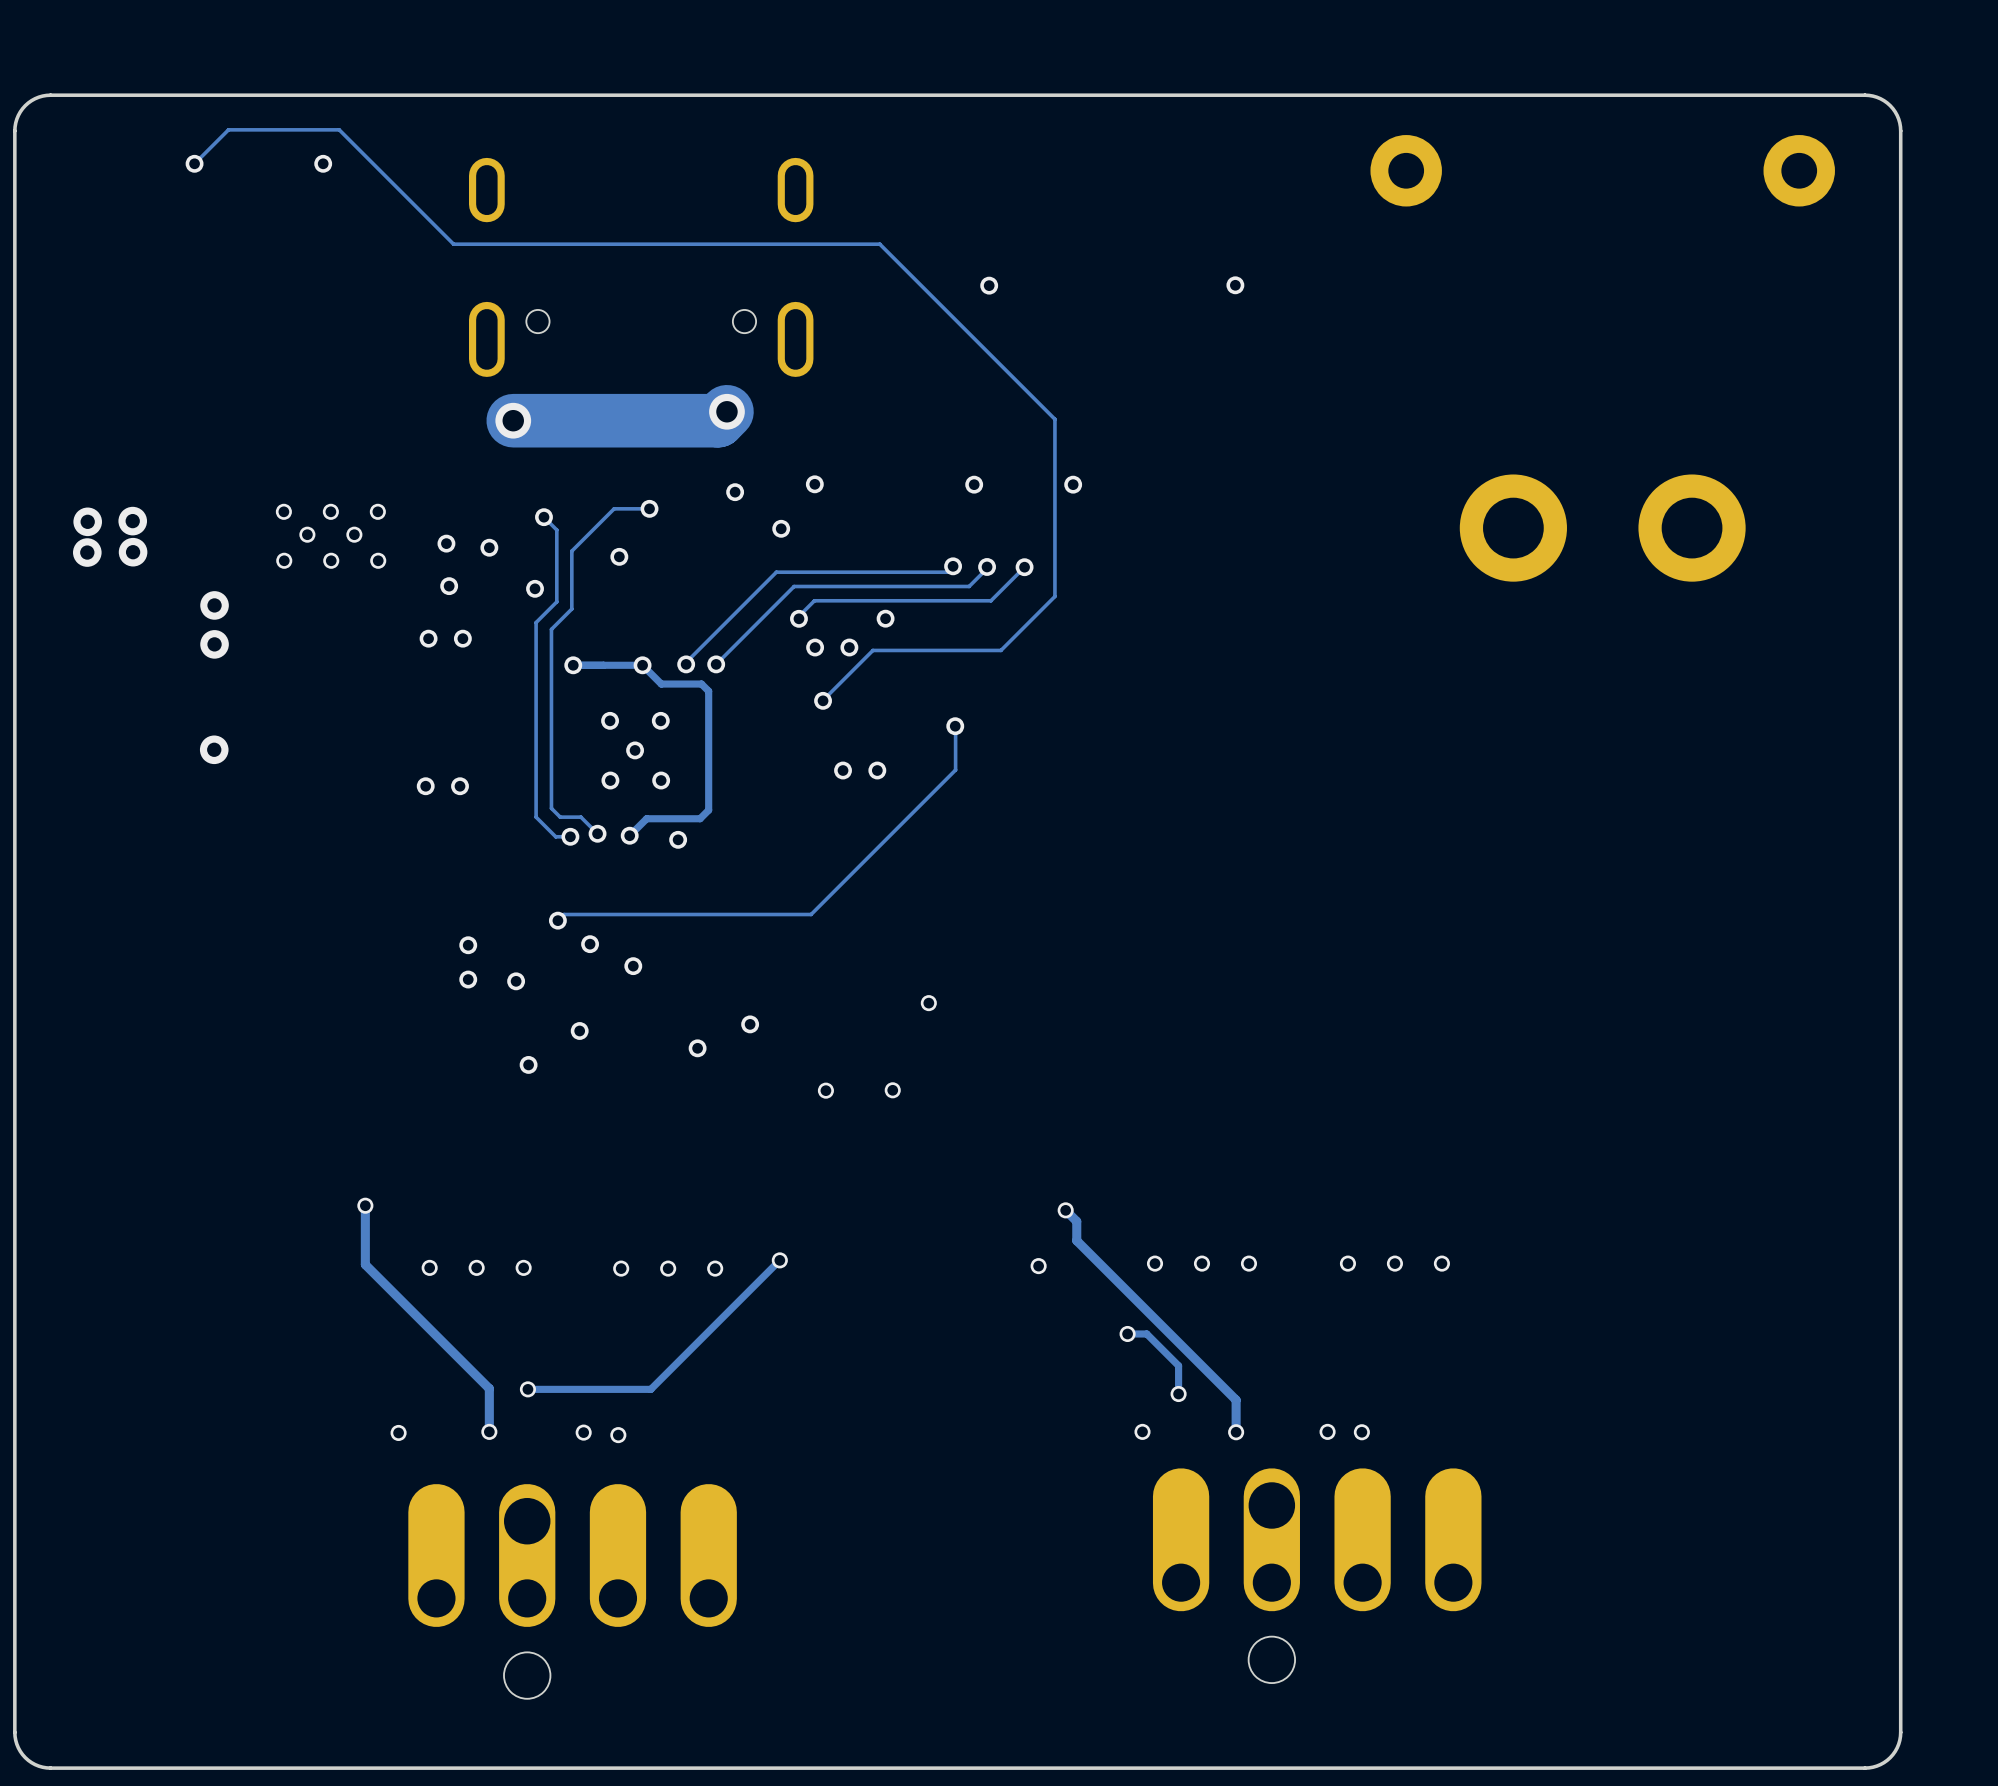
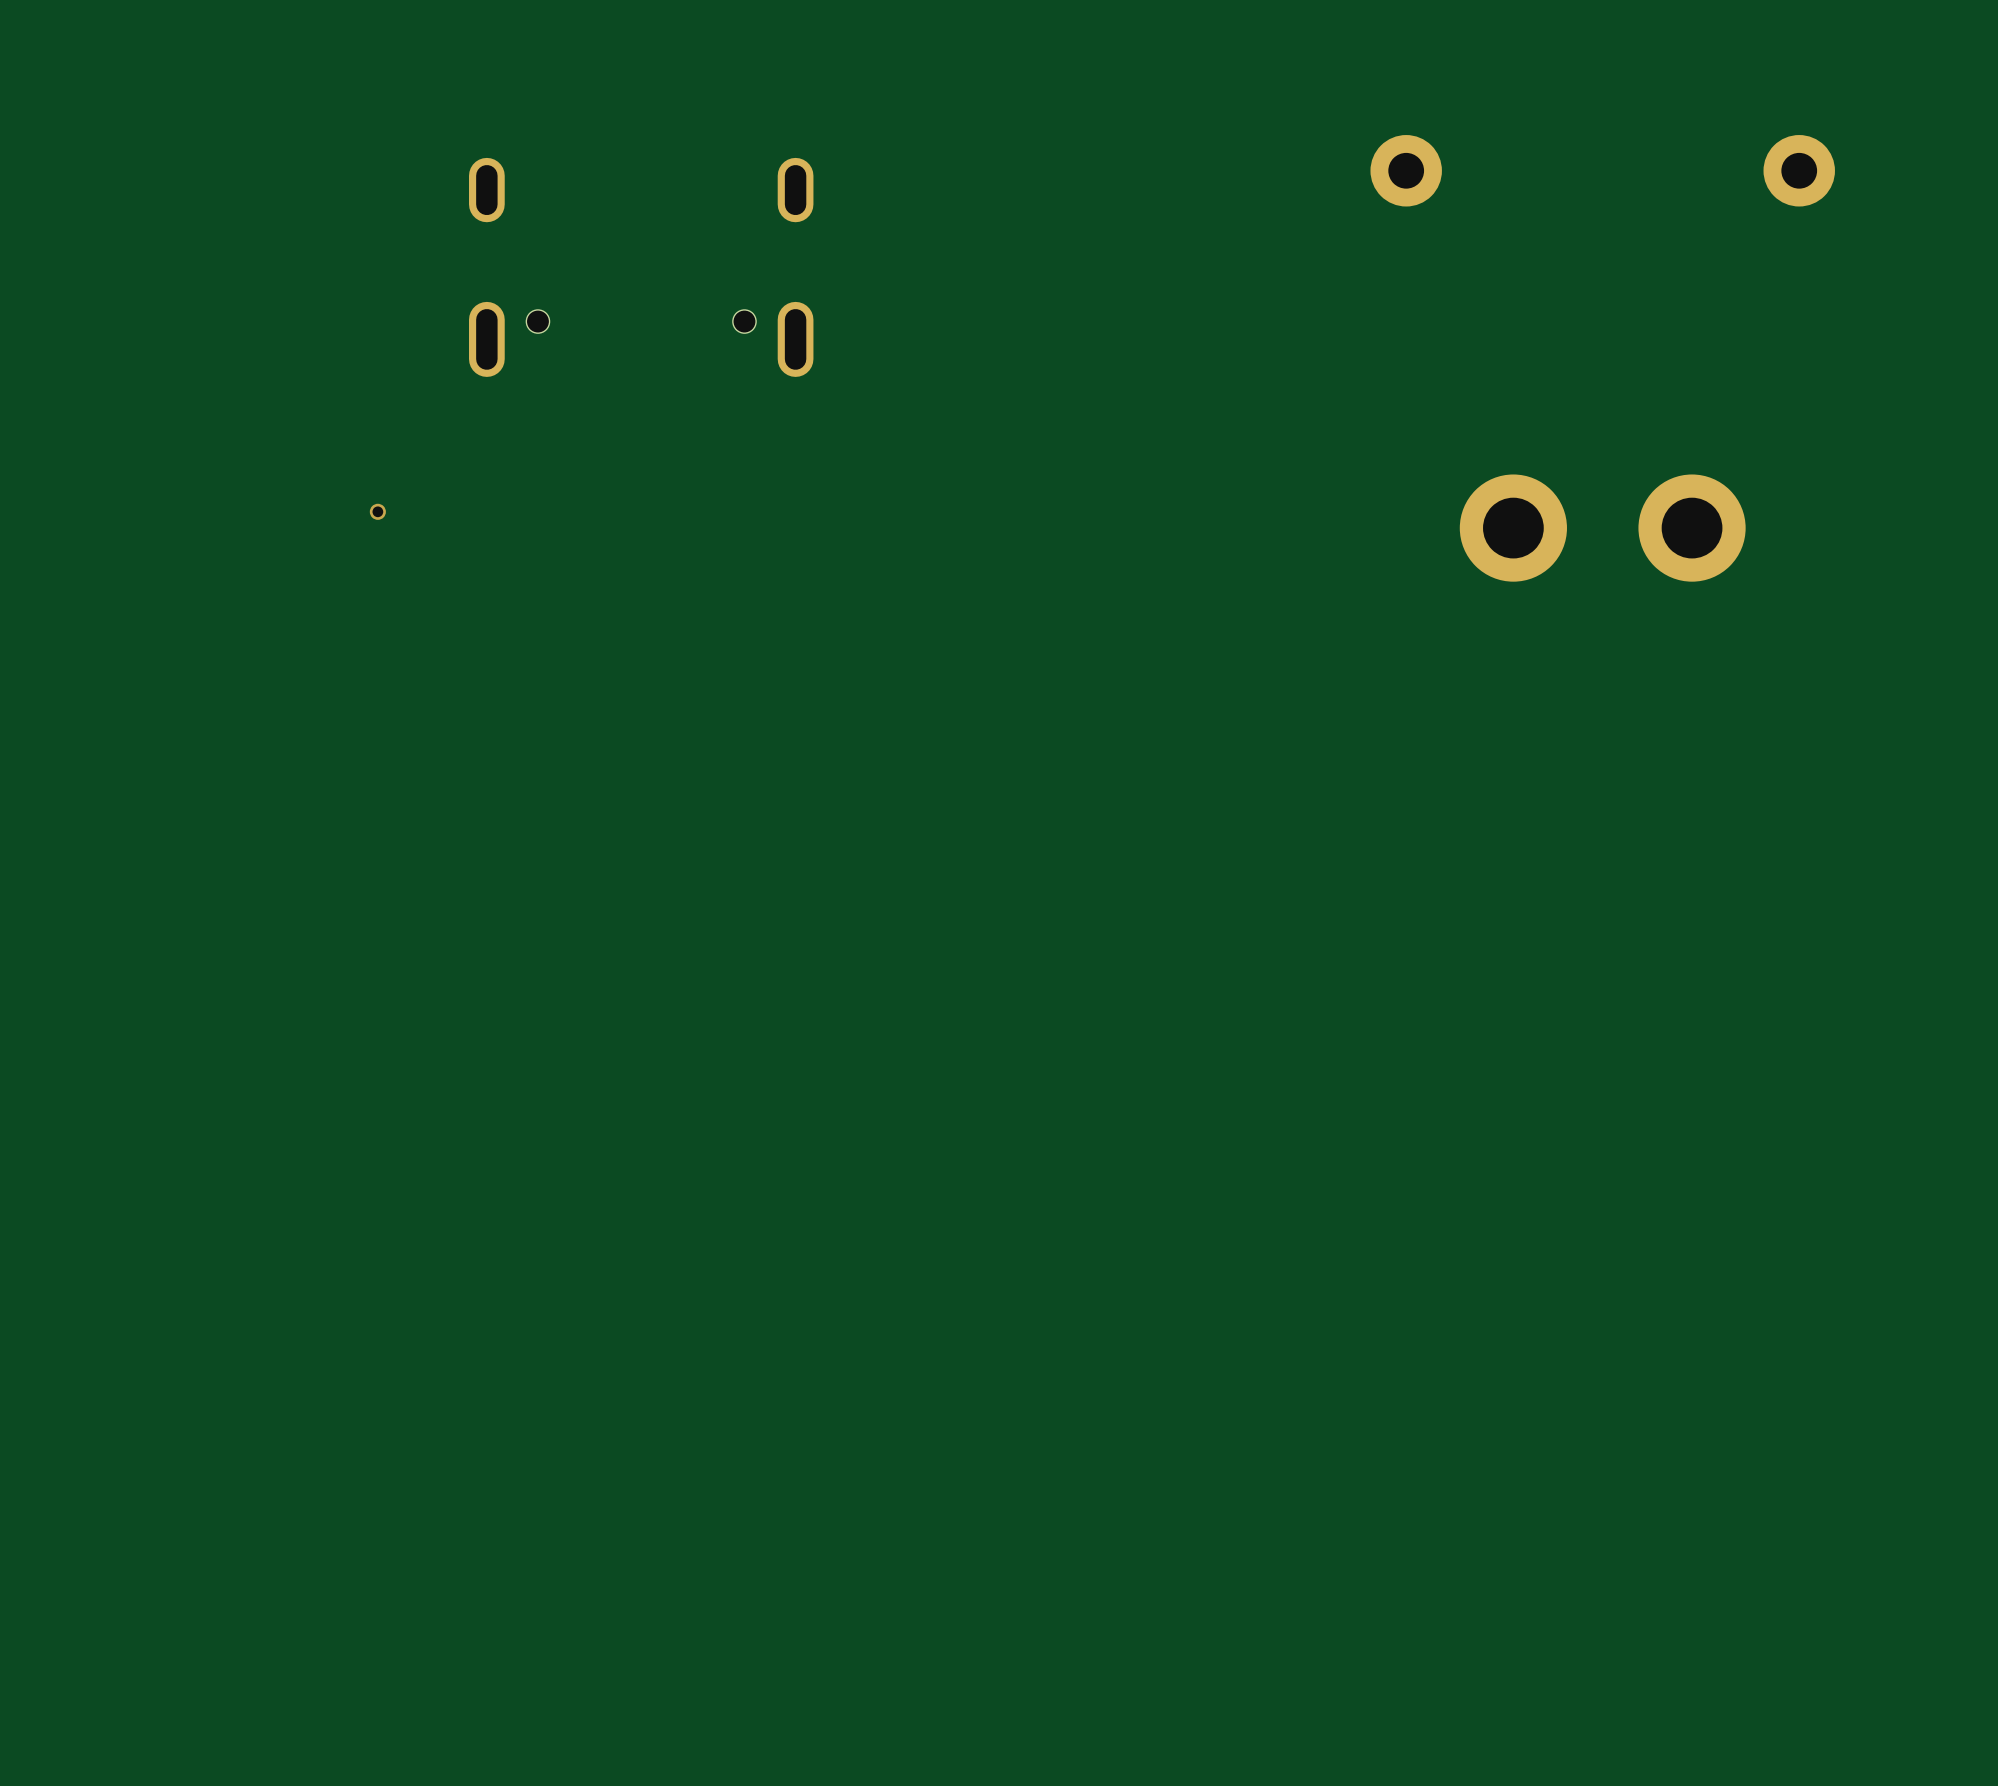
board edge: (1864, 95) (50, 95) (35, 98) (25, 105) (18, 115) (14, 130) (14, 1732) (18, 1747) (25, 1757) (35, 1764) (50, 1768) (1864, 1768) (1876, 1766) (1890, 1757) (1897, 1747) (1900, 1732) (1900, 130) (1897, 115) (1890, 105) (1876, 97) (1864, 95) -> none
track: (194, 163) (228, 129) (339, 129) (453, 244) (879, 244) (1054, 419) (1054, 596) (1000, 650) (872, 650) (823, 700) -> none
via: (194, 163) -> none
via: (323, 163) -> none
via: (989, 285) -> none
via: (1235, 285) -> none
track: (726, 411) (718, 420) (513, 420) -> none
via: (726, 411) -> none
via: (513, 420) -> none
via: (814, 484) -> none
via: (974, 484) -> none
via: (1073, 484) -> none
via: (735, 492) -> none
track: (649, 508) (614, 508) (571, 551) (571, 609) (551, 629) (551, 808) (560, 817) (580, 817) (597, 833) -> none
via: (649, 508) -> none
via: (283, 511) -> none
via: (330, 511) -> none
track: (543, 517) (556, 530) (556, 601) (536, 622) (536, 817) (555, 836) (570, 836) -> none
via: (543, 517) -> none
via: (87, 521) -> none
via: (132, 521) -> none
via: (781, 528) -> none
via: (307, 534) -> none
via: (354, 534) -> none
via: (446, 543) -> none
via: (489, 547) -> none
via: (87, 552) -> none
via: (133, 552) -> none
via: (619, 556) -> none
via: (284, 560) -> none
via: (331, 560) -> none
via: (378, 560) -> none
track: (953, 566) (947, 572) (776, 572) (686, 664) -> none
via: (953, 566) -> none
track: (987, 566) (969, 586) (794, 586) (716, 664) -> none
via: (987, 566) -> none
track: (1024, 567) (990, 600) (814, 600) (798, 616) (798, 618) -> none
via: (1024, 567) -> none
via: (449, 586) -> none
via: (535, 588) -> none
via: (214, 605) -> none
via: (798, 618) -> none
via: (885, 618) -> none
via: (428, 638) -> none
via: (462, 638) -> none
via: (214, 644) -> none
via: (815, 647) -> none
via: (849, 647) -> none
via: (686, 664) -> none
via: (716, 664) -> none
track: (572, 665) (642, 665) (661, 684) (701, 684) (708, 691) (708, 810) (700, 818) (646, 818) (629, 835) (629, 833) -> none
via: (573, 665) -> none
via: (642, 665) -> none
via: (823, 700) -> none
via: (610, 720) -> none
via: (660, 720) -> none
track: (955, 726) (955, 770) (811, 914) (564, 914) (557, 920) -> none
via: (955, 726) -> none
via: (214, 749) -> none
via: (635, 750) -> none
via: (843, 770) -> none
via: (877, 770) -> none
via: (610, 780) -> none
via: (661, 780) -> none
via: (425, 786) -> none
via: (460, 786) -> none
via: (597, 833) -> none
via: (629, 835) -> none
via: (570, 836) -> none
via: (678, 839) -> none
via: (557, 920) -> none
via: (590, 944) -> none
via: (468, 945) -> none
via: (633, 966) -> none
via: (468, 979) -> none
via: (516, 981) -> none
via: (928, 1003) -> none
via: (750, 1024) -> none
via: (579, 1030) -> none
via: (697, 1048) -> none
via: (528, 1064) -> none
via: (825, 1090) -> none
via: (892, 1090) -> none
track: (365, 1205) (365, 1264) (489, 1388) (489, 1431) -> none
via: (365, 1205) -> none
track: (1065, 1210) (1076, 1221) (1076, 1240) (1236, 1400) (1236, 1432) -> none
via: (1065, 1210) -> none
track: (779, 1260) (650, 1389) (527, 1389) -> none
via: (779, 1260) -> none
via: (1155, 1263) -> none
via: (1201, 1263) -> none
via: (1248, 1263) -> none
via: (1347, 1263) -> none
via: (1394, 1263) -> none
via: (1441, 1263) -> none
via: (1038, 1266) -> none
via: (429, 1267) -> none
via: (476, 1267) -> none
via: (523, 1267) -> none
via: (621, 1268) -> none
via: (668, 1268) -> none
via: (715, 1268) -> none
track: (1127, 1333) (1146, 1333) (1178, 1365) (1178, 1394) -> none
via: (1127, 1333) -> none
via: (527, 1389) -> none
via: (1178, 1394) -> none
via: (489, 1431) -> none
via: (1142, 1431) -> none
via: (1327, 1431) -> none
via: (398, 1432) -> none
via: (583, 1432) -> none
via: (1236, 1432) -> none
via: (1361, 1432) -> none
via: (618, 1435) -> none
part: (1317, 1575) -> none
part: (572, 1591) -> none

